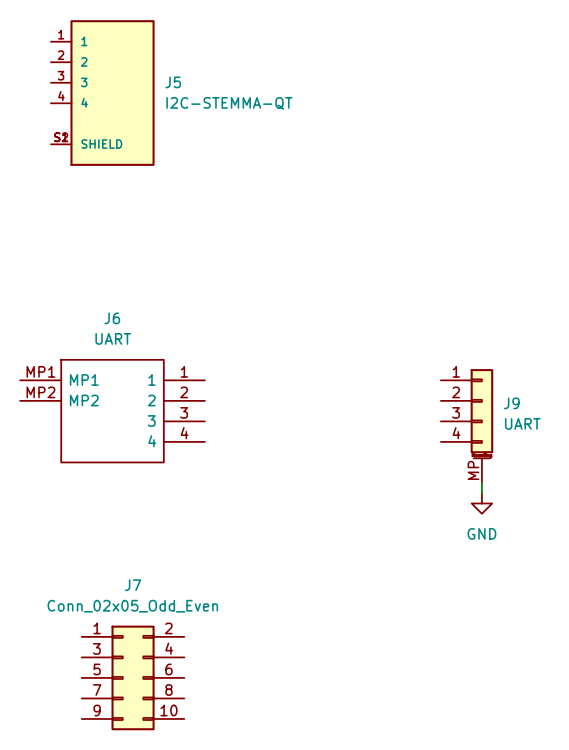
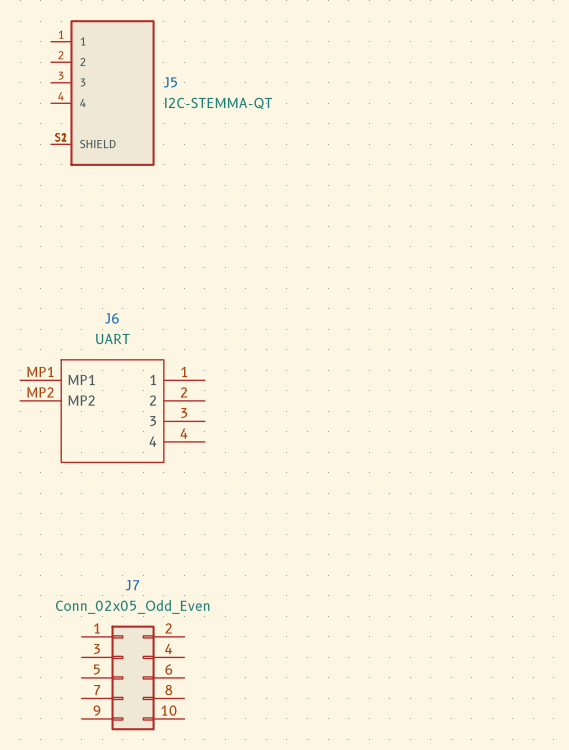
J9: UART (467, 426) -> none
wire: (481, 482) (481, 493) -> none
power symbol: GND (481, 503) -> none

